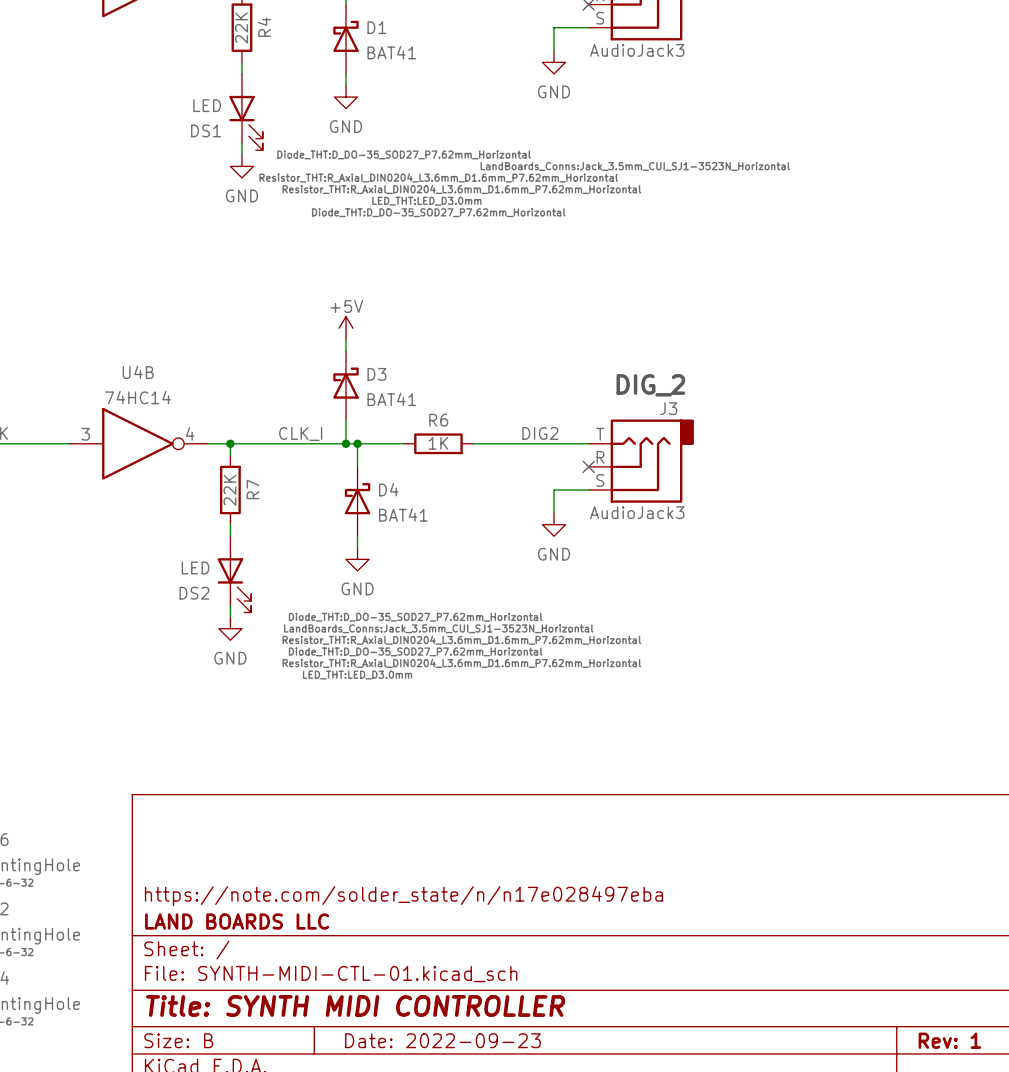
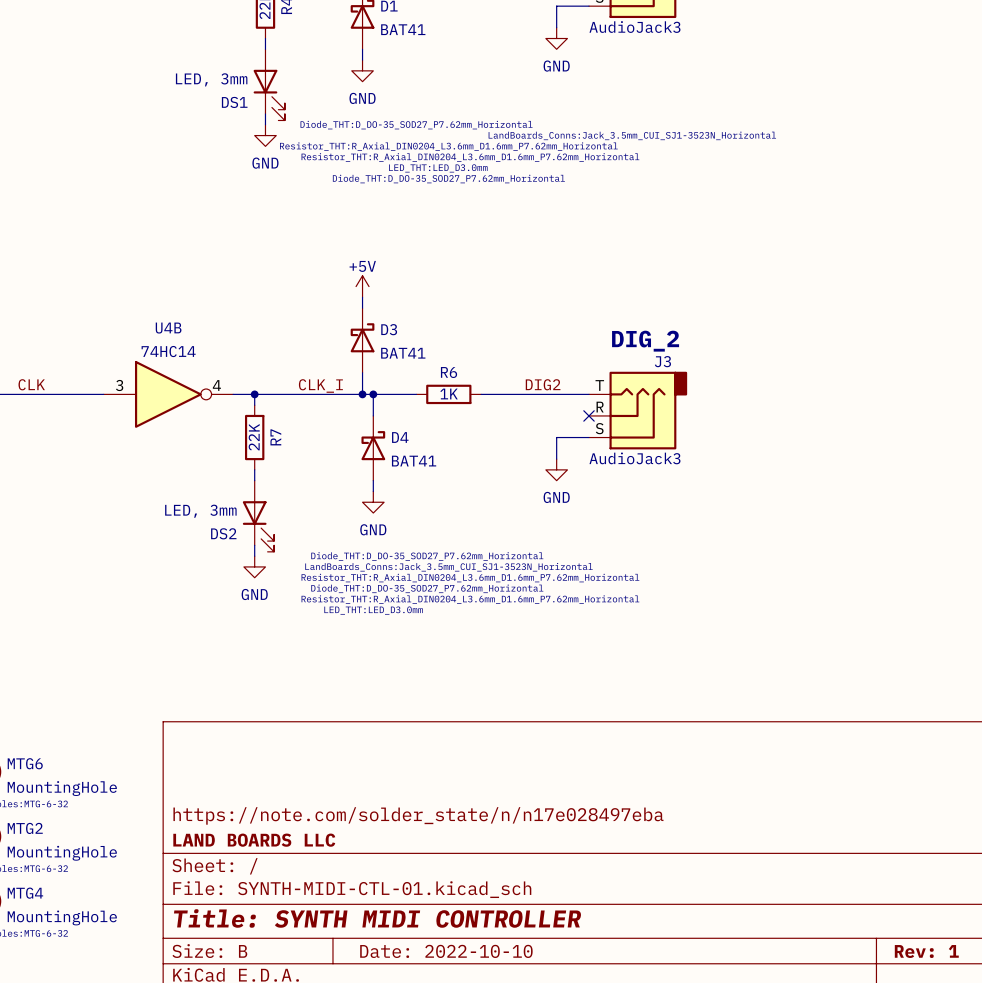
DS1 value: LED (207, 105) -> LED, 3mm (211, 79)
DS2 value: LED (195, 567) -> LED, 3mm (200, 511)
title block: Date: 2022-09-23 (442, 1040) -> Date: 2022-10-10 (446, 951)

